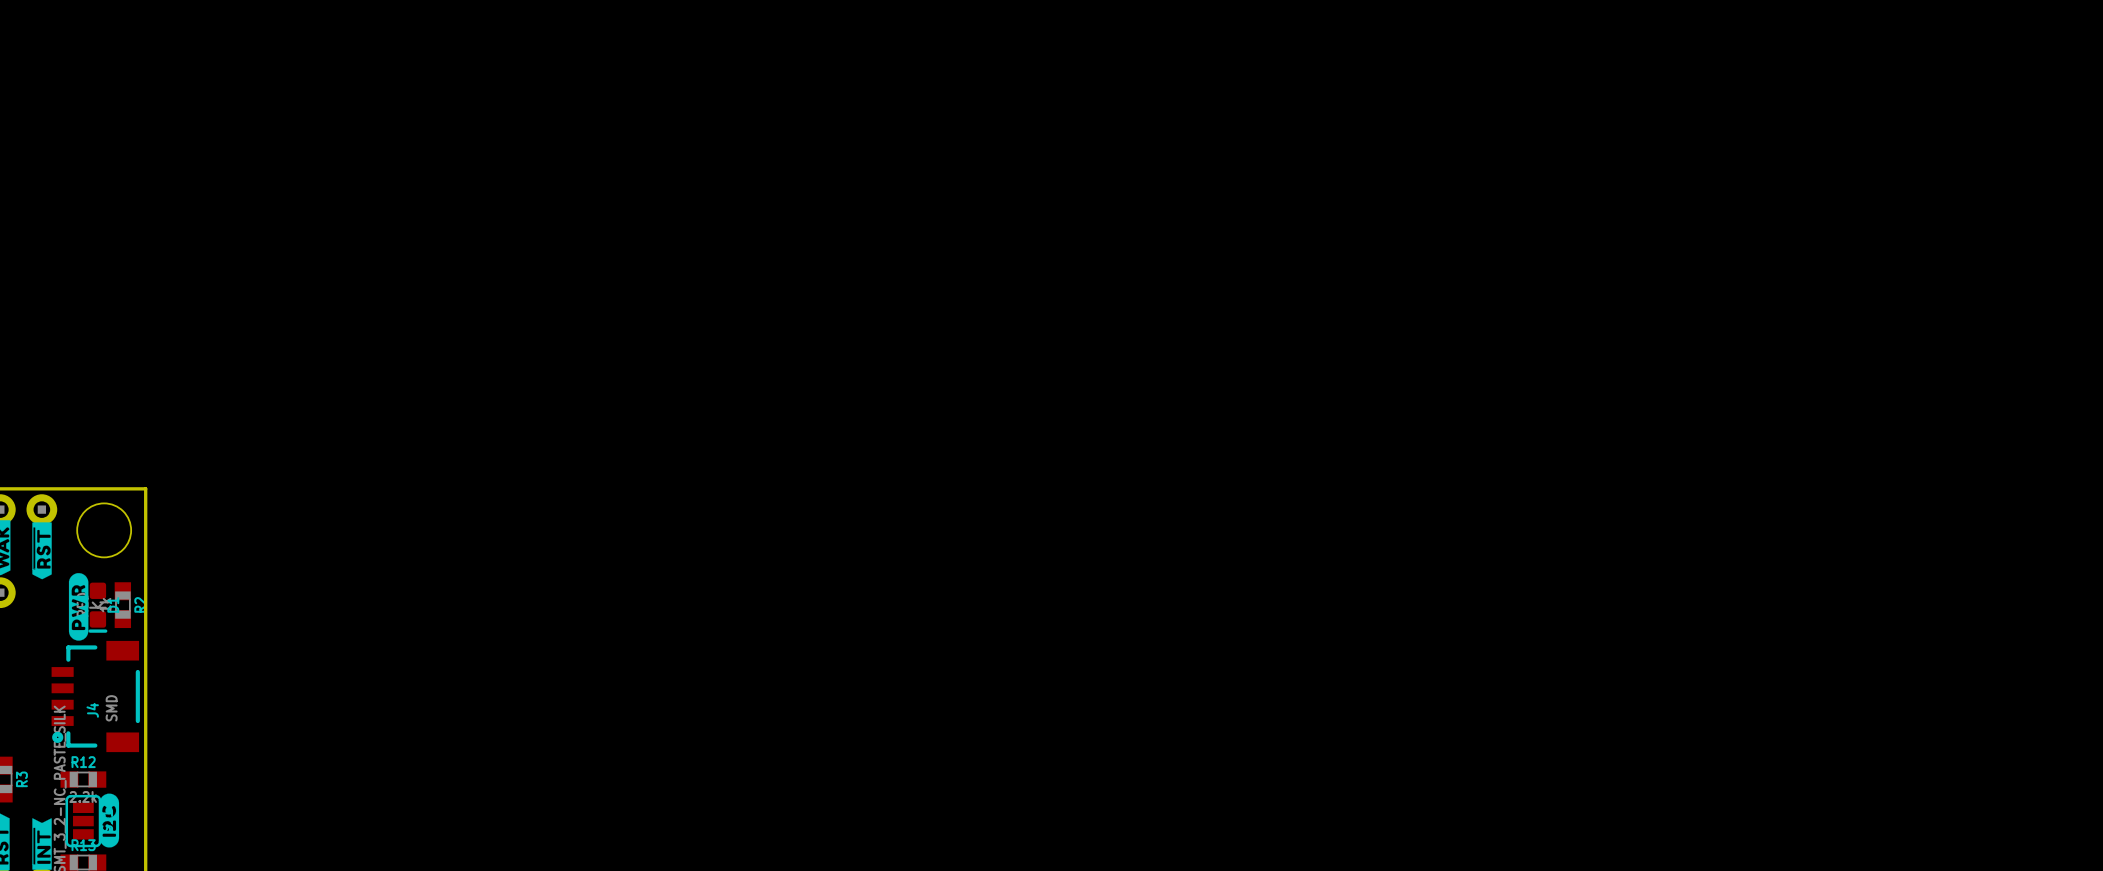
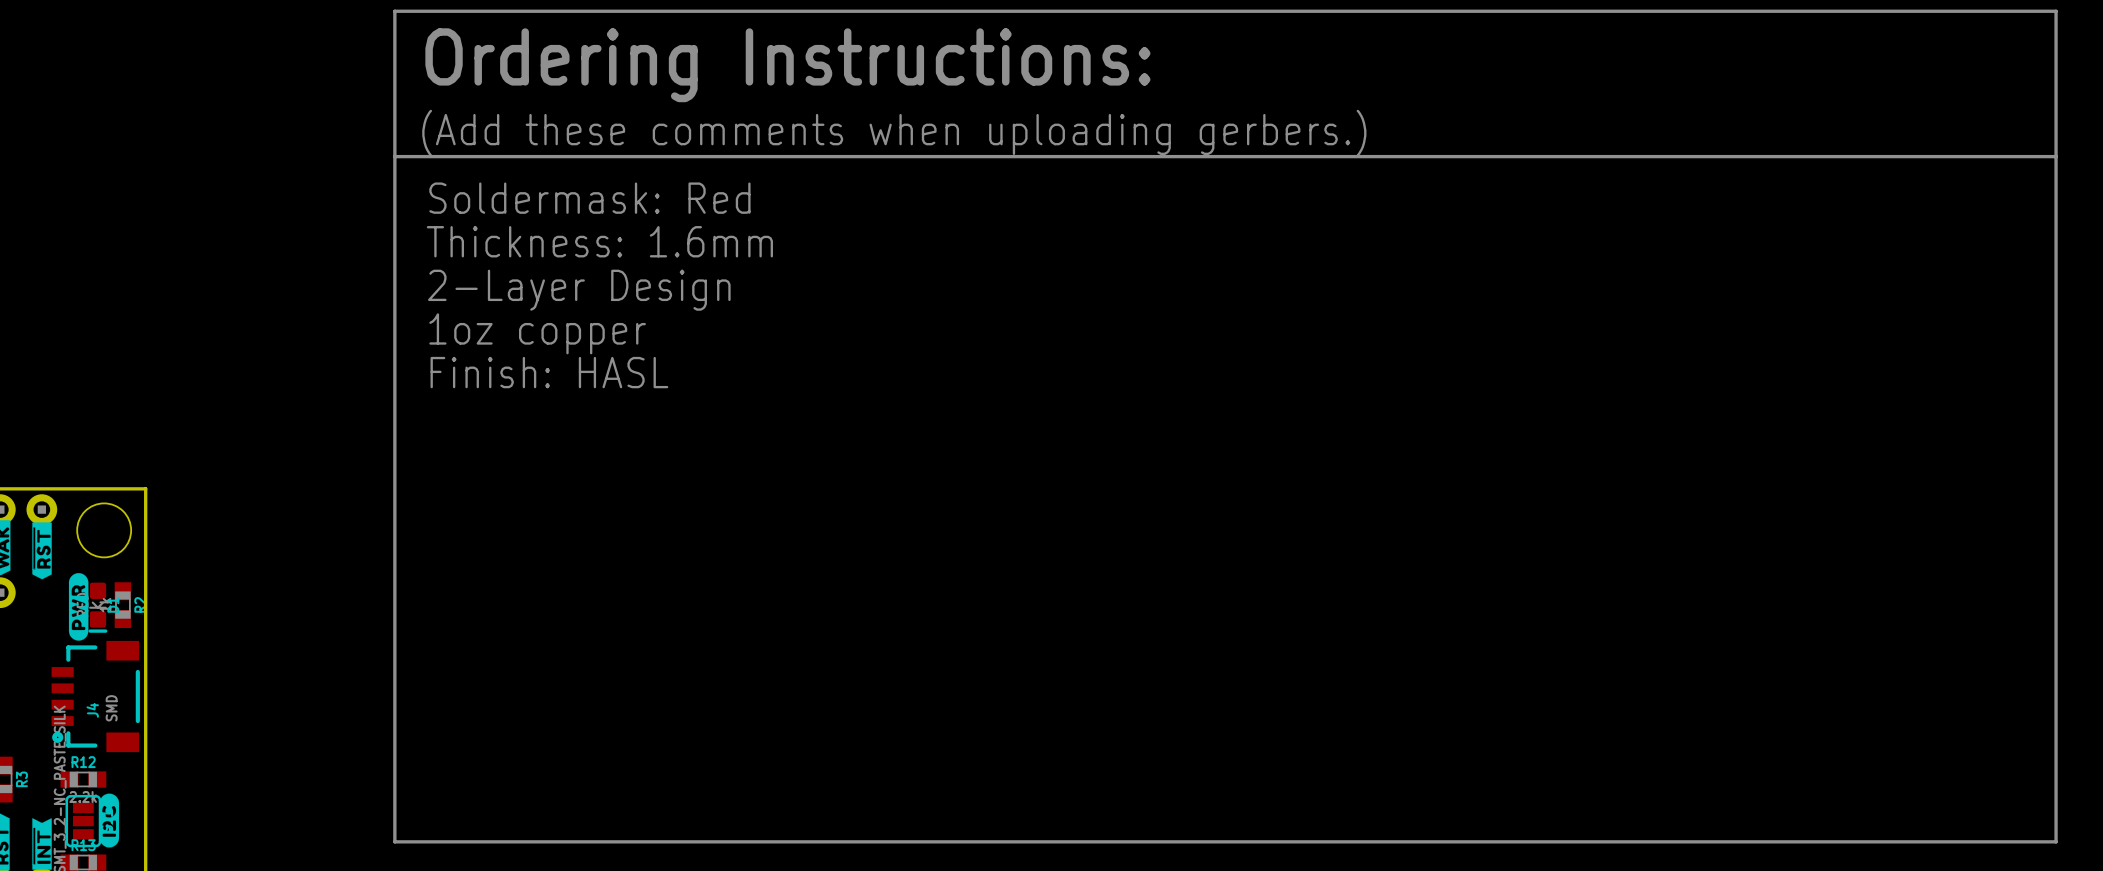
drawing: none -> [393, 9, 2058, 844]
text: none -> Soldermask: Red (589, 198)
text: none -> Thickness: 1.6mm (599, 241)
text: none -> 2-Layer Design (579, 290)
text: none -> 1oz copper (537, 333)
text: none -> Finish: HASL (549, 372)

